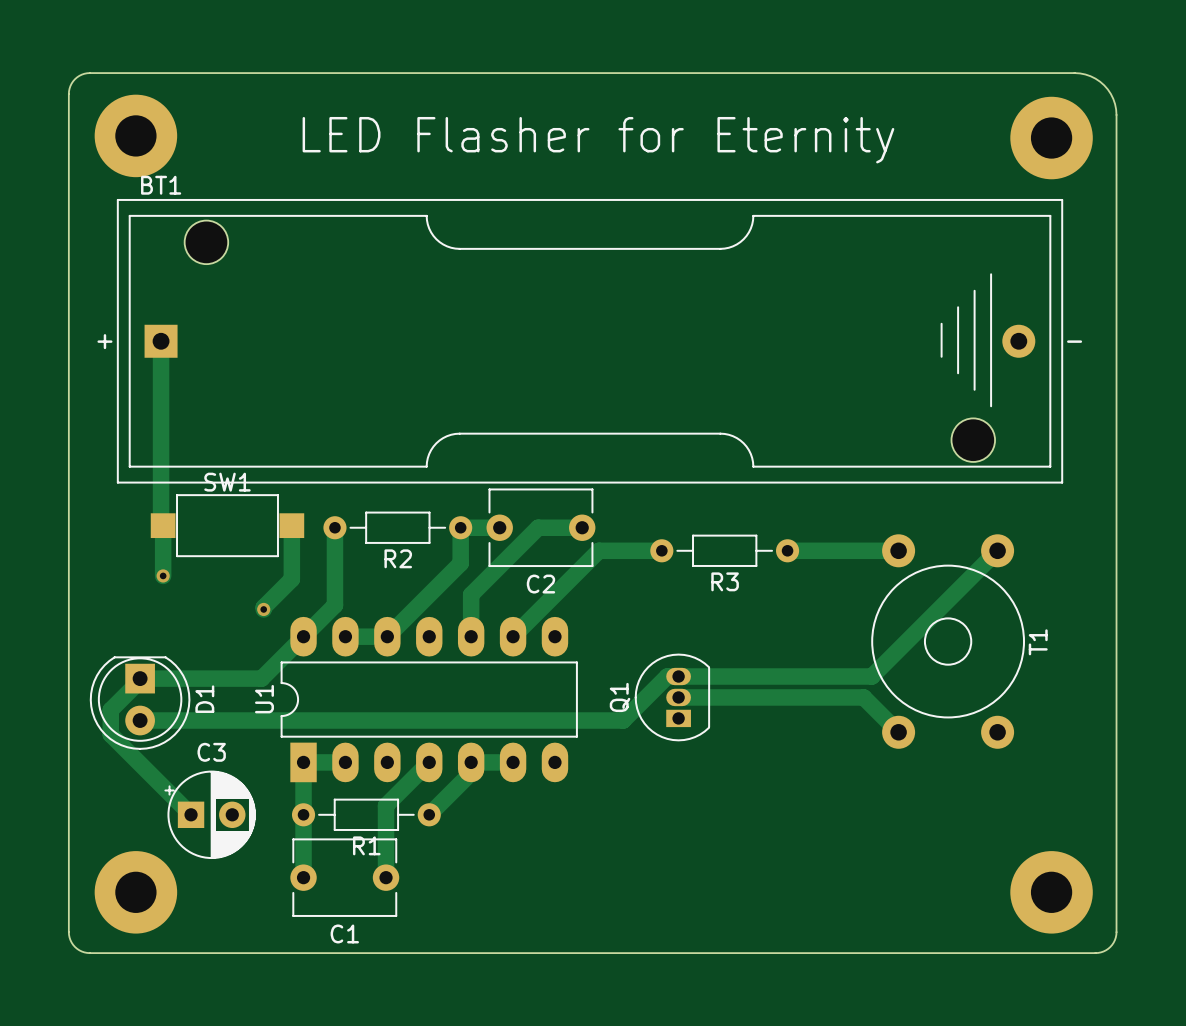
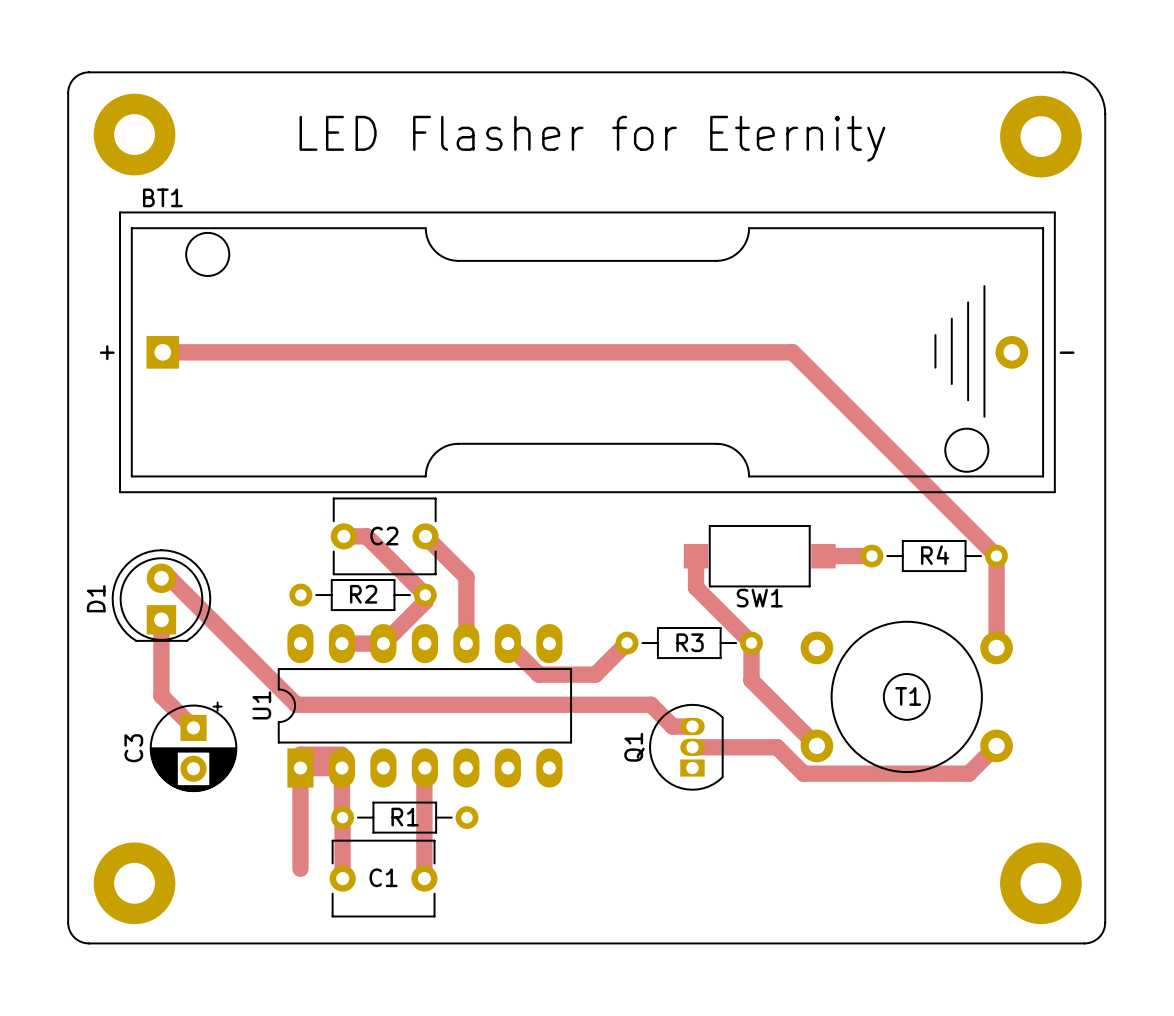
track: (161, 341) (161, 523) (163, 525) (163, 575) -> none
BT1 position: (590, 341) -> (587, 352)
track: none -> (162, 352) (792, 352) (996, 556) (996, 647)
SW1 name position: SW1 (227, 482) -> SW1 (759, 598)
SW1 position: (227, 525) -> (759, 556)
track: (291, 525) (291, 579) (263, 609) -> none
track: (334, 527) (334, 605) (261, 678) (140, 678) (110, 710) (110, 734) (191, 814) -> none
R2 position: (397, 527) -> (363, 595)
track: (499, 527) (460, 527) (460, 563) (387, 636) (345, 636) -> none
C2 position: (540, 527) -> (384, 536)
track: (582, 527) (538, 527) (471, 594) -> (425, 536) (466, 577) (466, 588)
track: none -> (343, 536) (366, 536) (425, 595) (425, 601) (383, 643) (341, 643)
track: (661, 550) (598, 550) (513, 636) -> none
R3 position: (724, 550) -> (689, 643)
track: (787, 550) (898, 550) -> none
track: (997, 550) (871, 676) (667, 676) (623, 720) (140, 720) -> none
R2 name position: R2 (398, 558) -> R2 (363, 594)
track: none -> (696, 556) (696, 587) (751, 643) (751, 680) (816, 745)
track: none -> (823, 556) (871, 556)
R4: none -> (934, 556)
via: (163, 575) -> none
R3 name position: R3 (725, 581) -> R3 (690, 642)
track: none -> (161, 578) (169, 578) (296, 704) (650, 704) (672, 726) (692, 726)
C2 name position: C2 (540, 584) -> C2 (384, 536)
via: (263, 609) -> none
track: none -> (161, 619) (161, 695) (193, 727)
T1 rotation: 0° (948, 641) -> 90° clockwise (906, 696)
T1 name position: T1 (1038, 642) -> T1 (908, 696)
track: none -> (627, 643) (595, 674) (538, 674) (507, 643)
Q1 position: (672, 697) -> (686, 747)
track: (678, 697) (863, 697) (898, 732) -> none
U1 position: (429, 699) -> (424, 705)
D1 rotation: 0° (140, 703) -> 180° (161, 595)
D1 position: (140, 703) -> (161, 595)
C3 name position: C3 (211, 752) -> C3 (133, 748)
track: none -> (996, 745) (968, 773) (803, 773) (777, 747) (692, 747)
track: (429, 762) (386, 805) (386, 877) -> none
track: (513, 762) (471, 762) (471, 772) (429, 814) -> none
track: none -> (300, 768) (341, 768) (342, 878)
track: none -> (424, 768) (424, 878)
C3 rotation: 0° (210, 814) -> 90° clockwise (193, 746)
C3 position: (210, 814) -> (193, 746)
R1 position: (366, 814) -> (404, 817)
R1 name position: R1 (366, 845) -> R1 (405, 817)
C1 position: (344, 877) -> (383, 878)
C1 name position: C1 (344, 933) -> C1 (383, 877)

